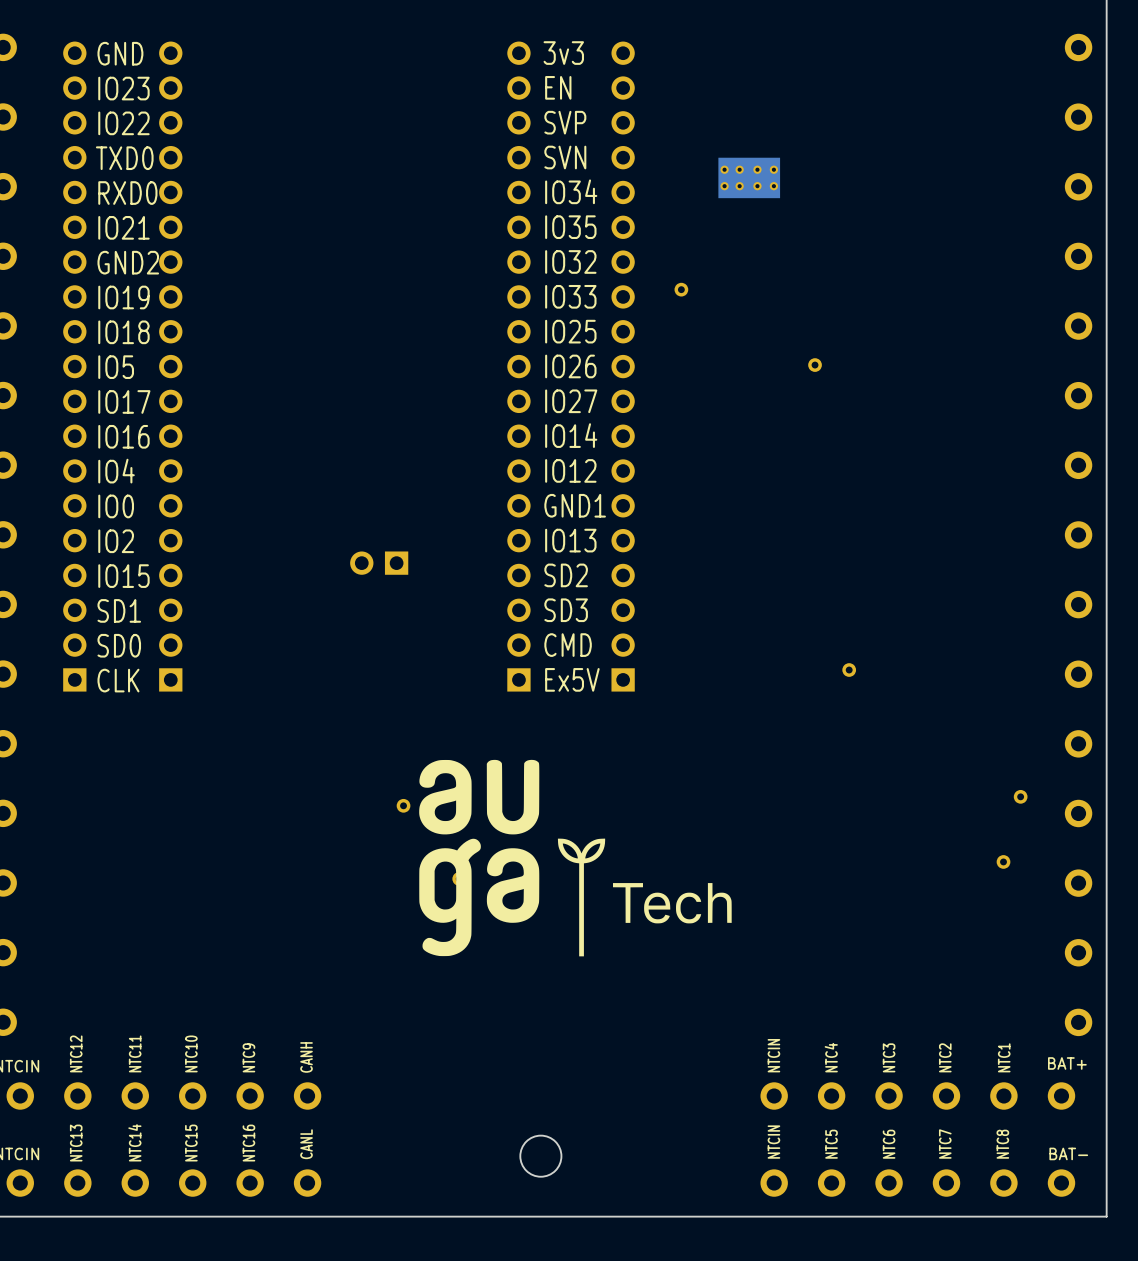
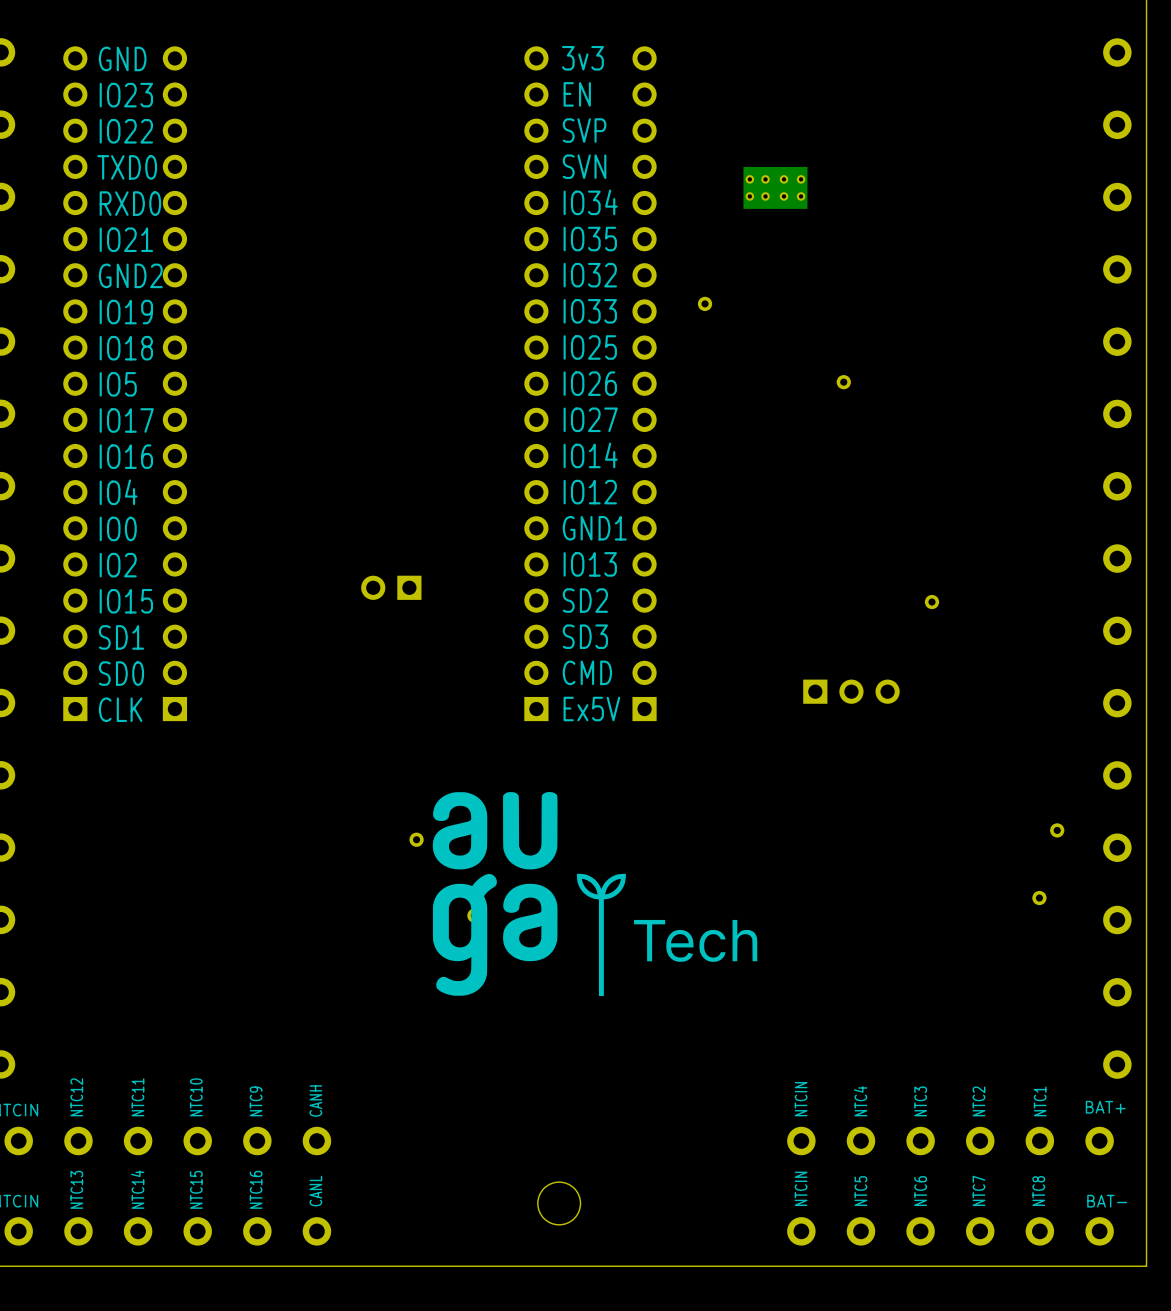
part: none -> (851, 691)
part position: (849, 670) -> (932, 602)

